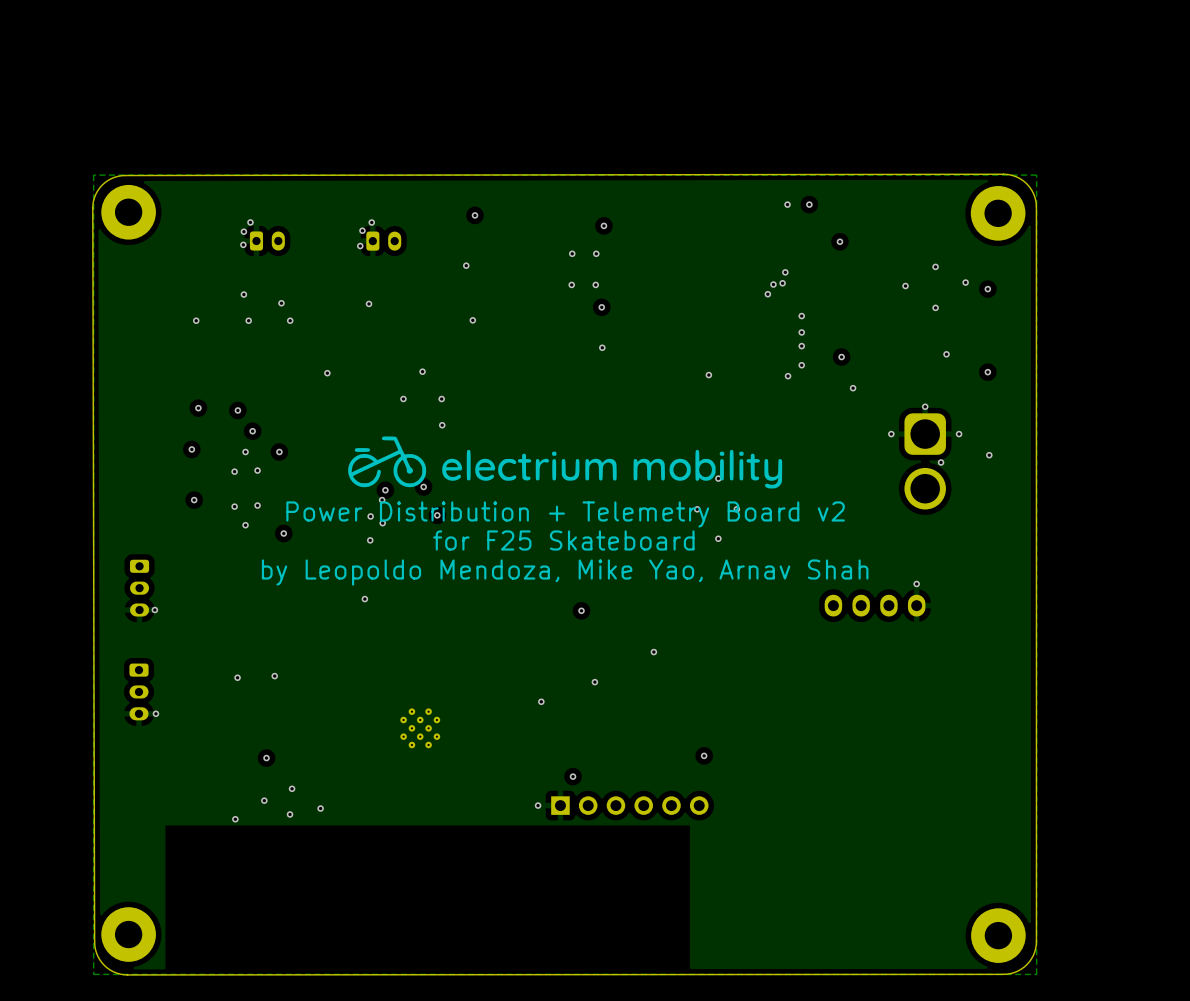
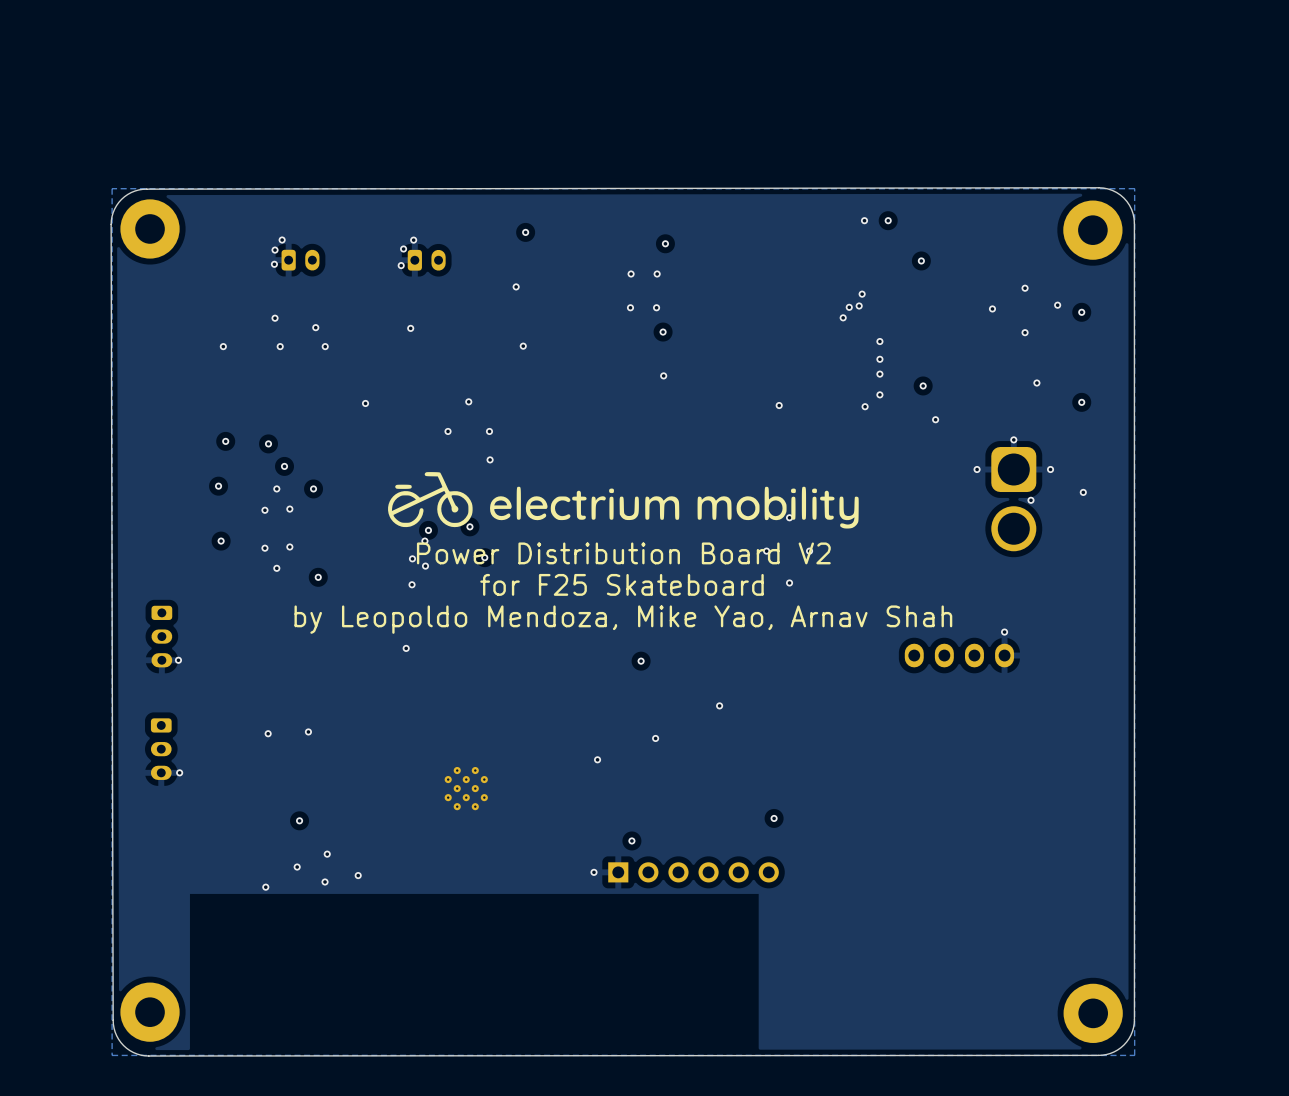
text: Power Distribution + Telemetry Board v2 (565, 514) -> Power Distribution Board V2 (623, 553)

